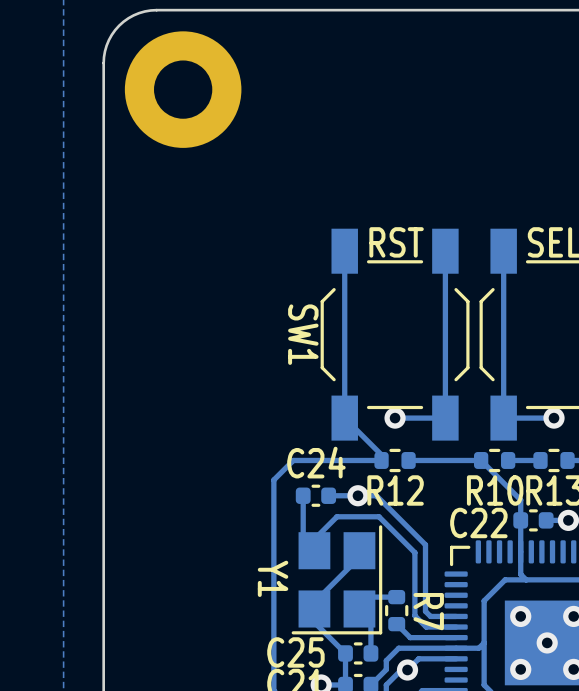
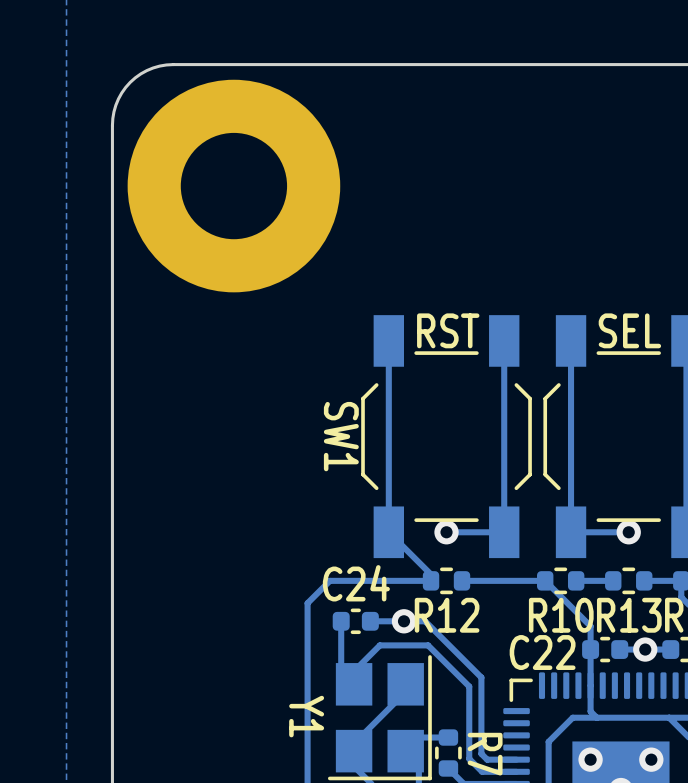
part: (183, 89) -> none
part: none -> (233, 186)

